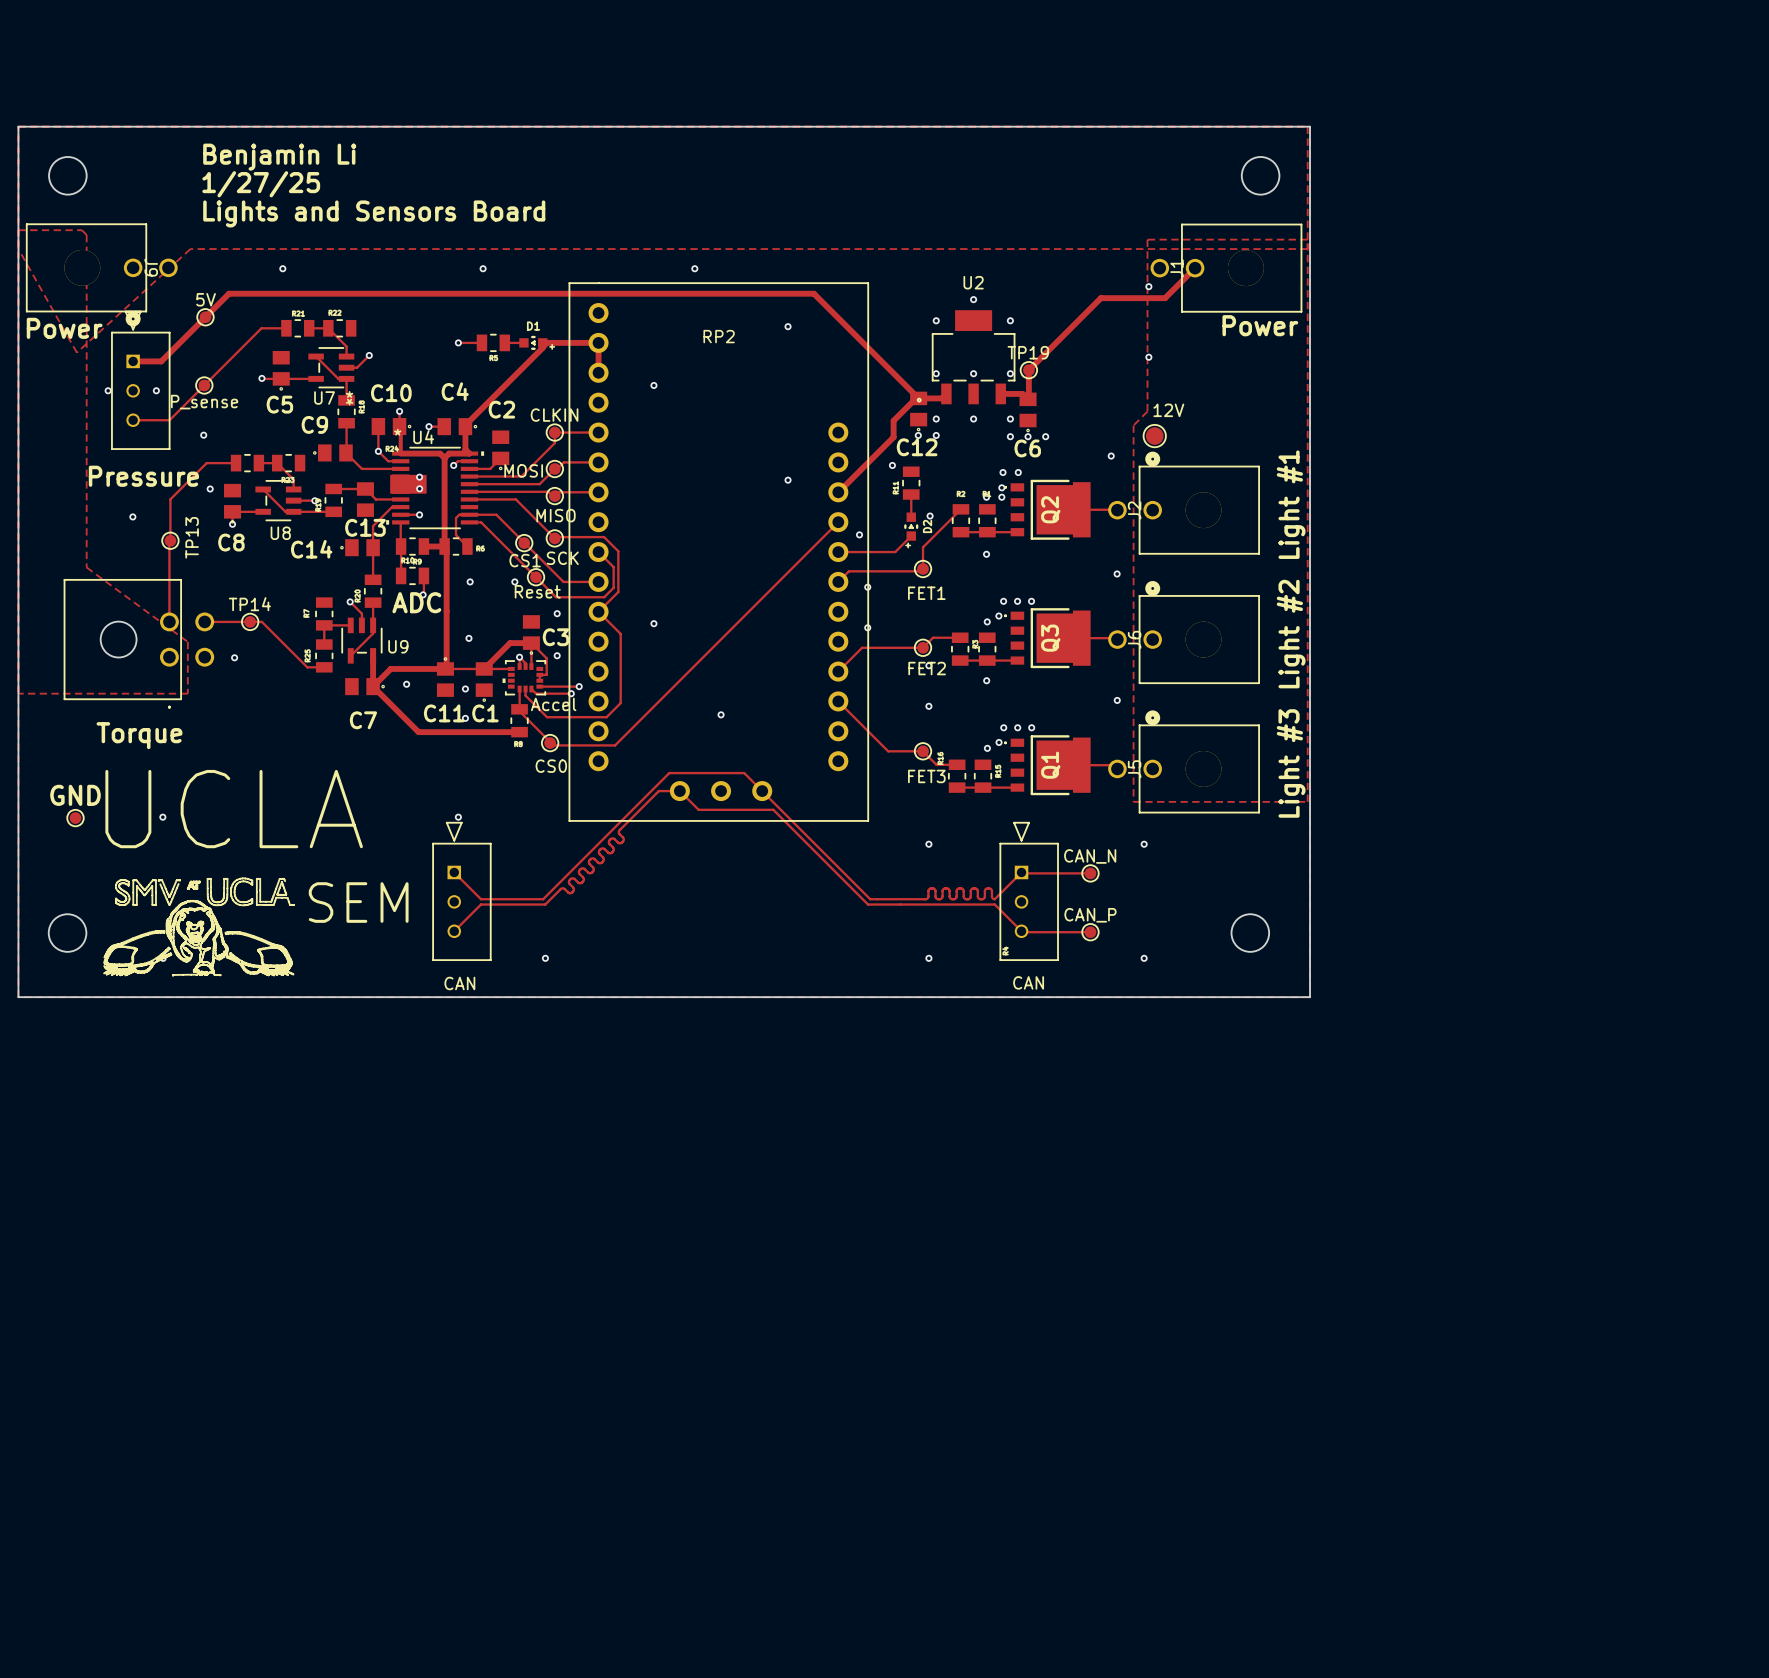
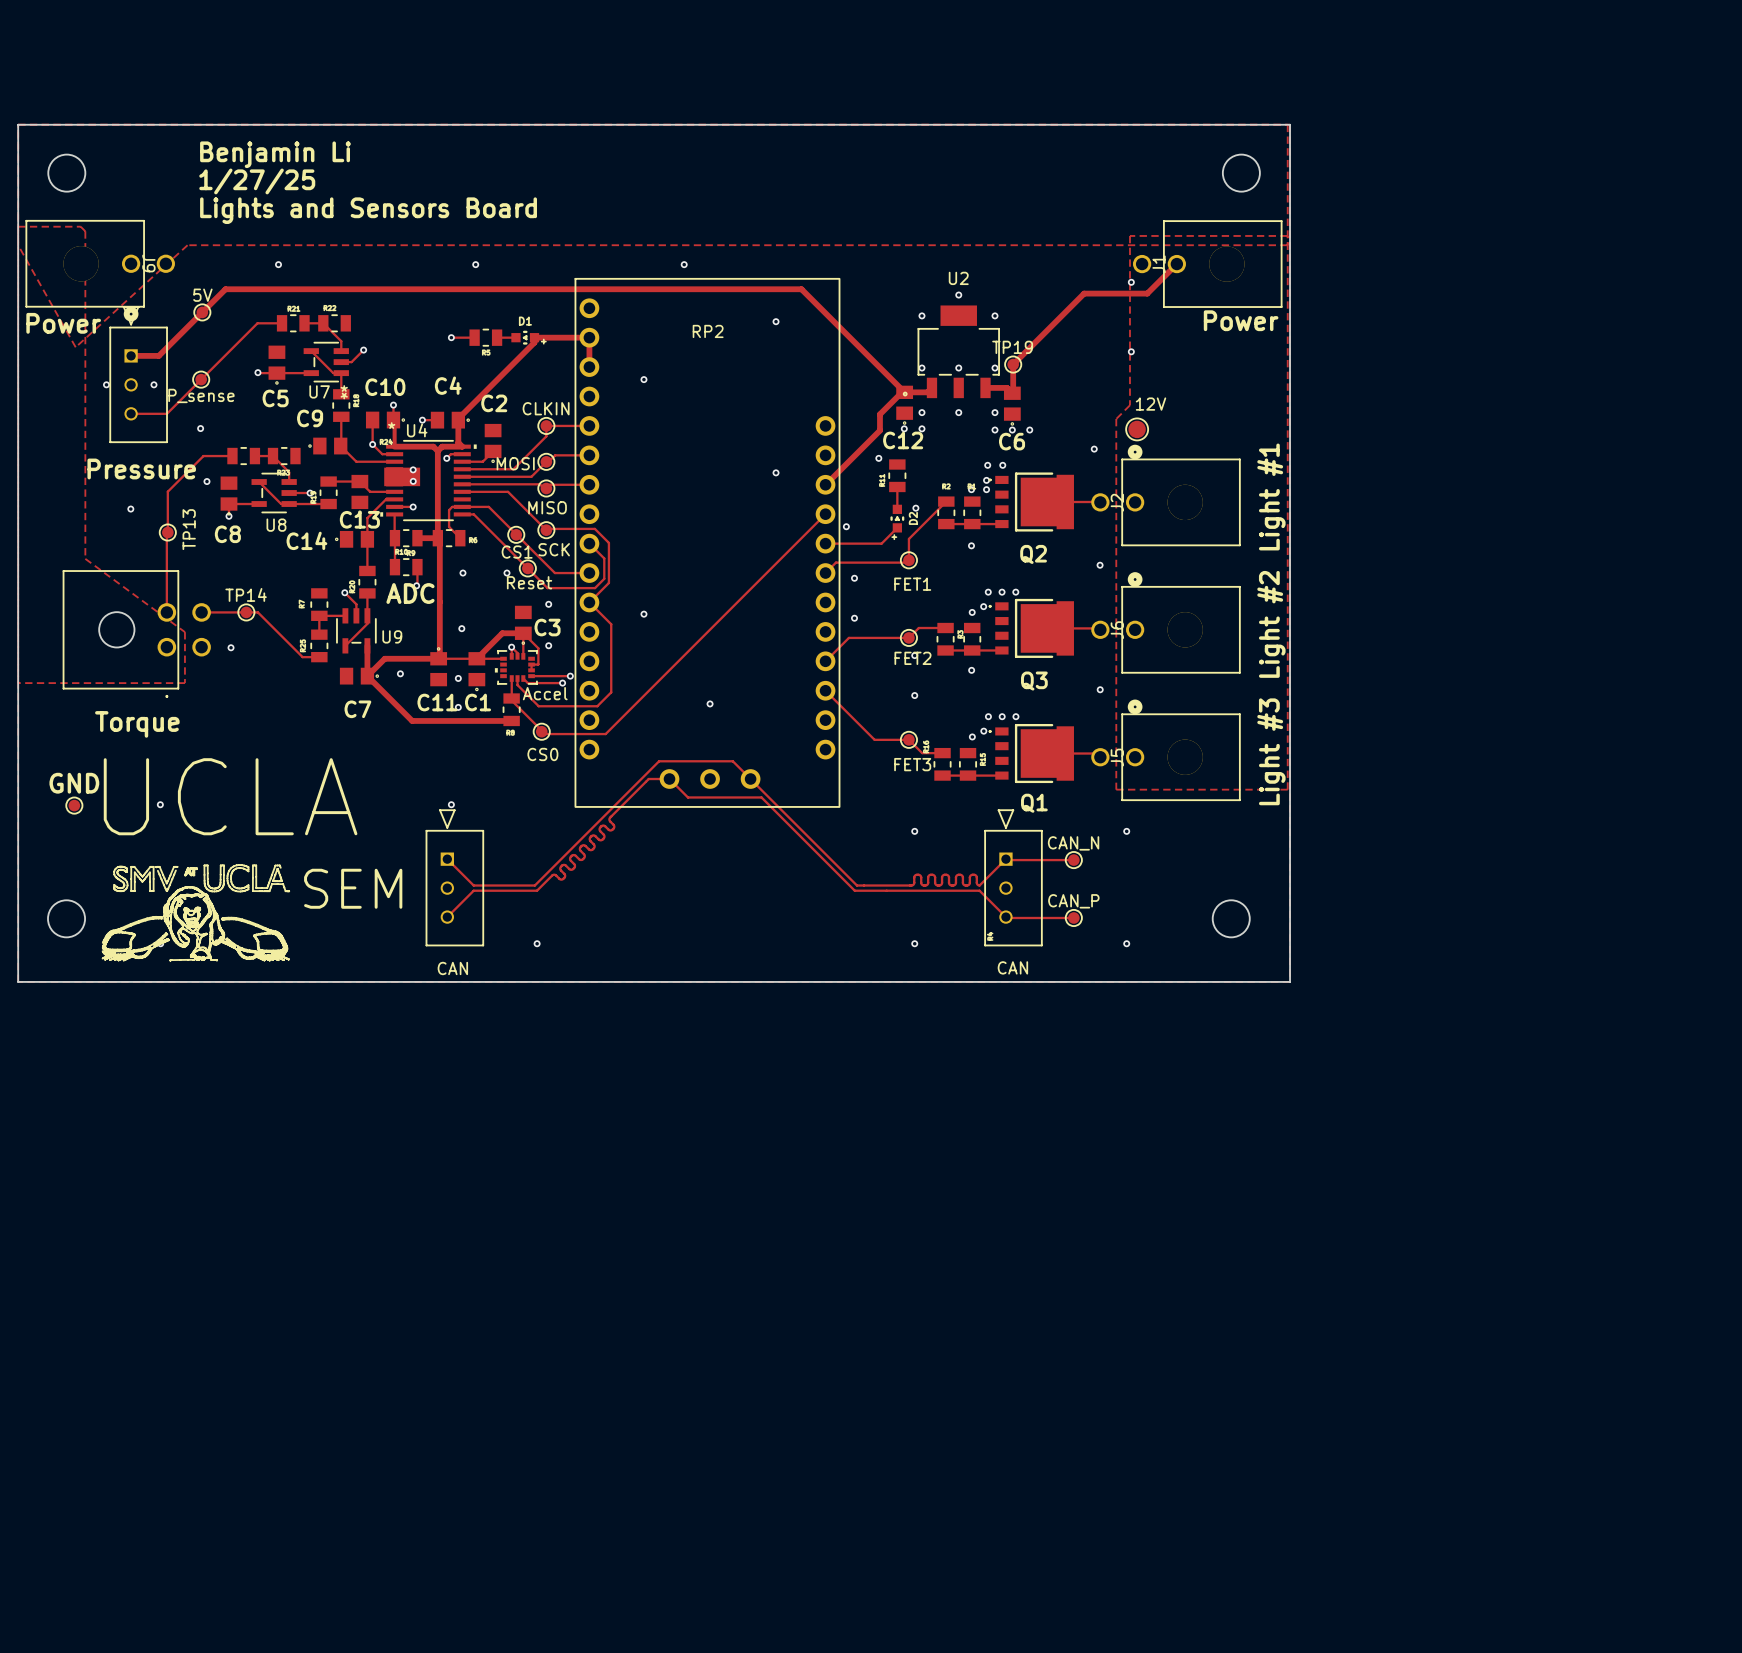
RP2 footprint: [568, 282, 869, 822] -> [574, 278, 841, 808]
Q2 name rotation: 0° (1050, 509) -> 90° clockwise (1033, 554)
Q2 name position: Q2 (1050, 509) -> Q2 (1033, 554)
Q3 name rotation: 0° (1050, 638) -> 90° clockwise (1034, 681)
Q3 name position: Q3 (1050, 638) -> Q3 (1034, 681)
Q1 name rotation: 0° (1050, 765) -> 90° clockwise (1034, 803)
Q1 name position: Q1 (1050, 765) -> Q1 (1034, 803)

